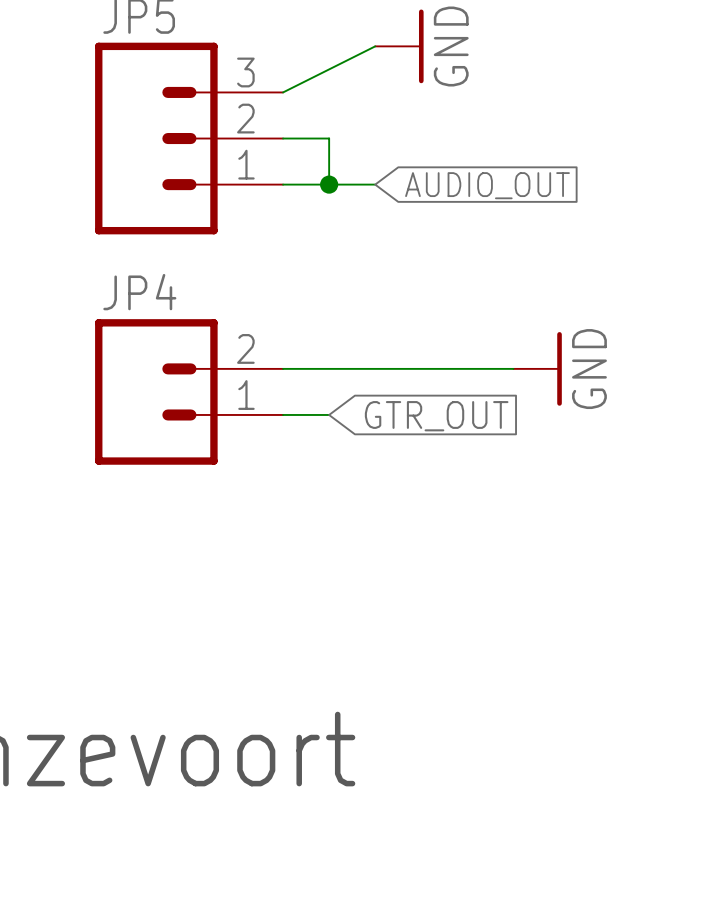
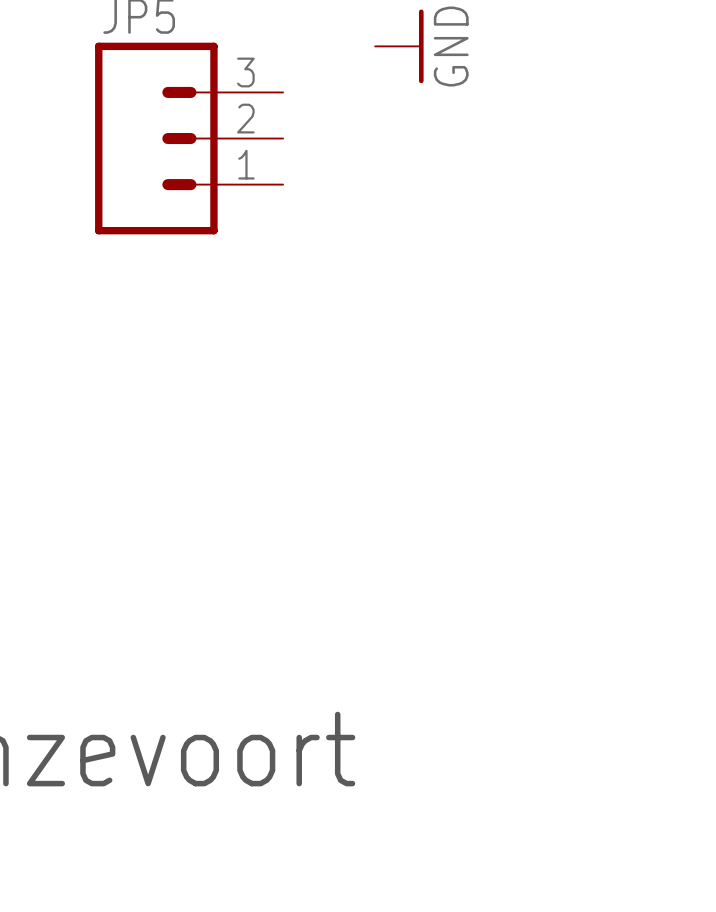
wire: (375, 46) (283, 92) -> none
wire: (283, 138) (329, 138) (329, 184) -> none
wire: (283, 184) (375, 184) -> none
junction: (329, 184) -> none
global label: AUDIO_OUT (487, 185) -> none
wire: (283, 368) (513, 368) -> none
power symbol: GND (537, 368) -> none
JP4: (189, 391) -> none
wire: (283, 414) (329, 414) -> none
global label: GTR_OUT (436, 416) -> none

